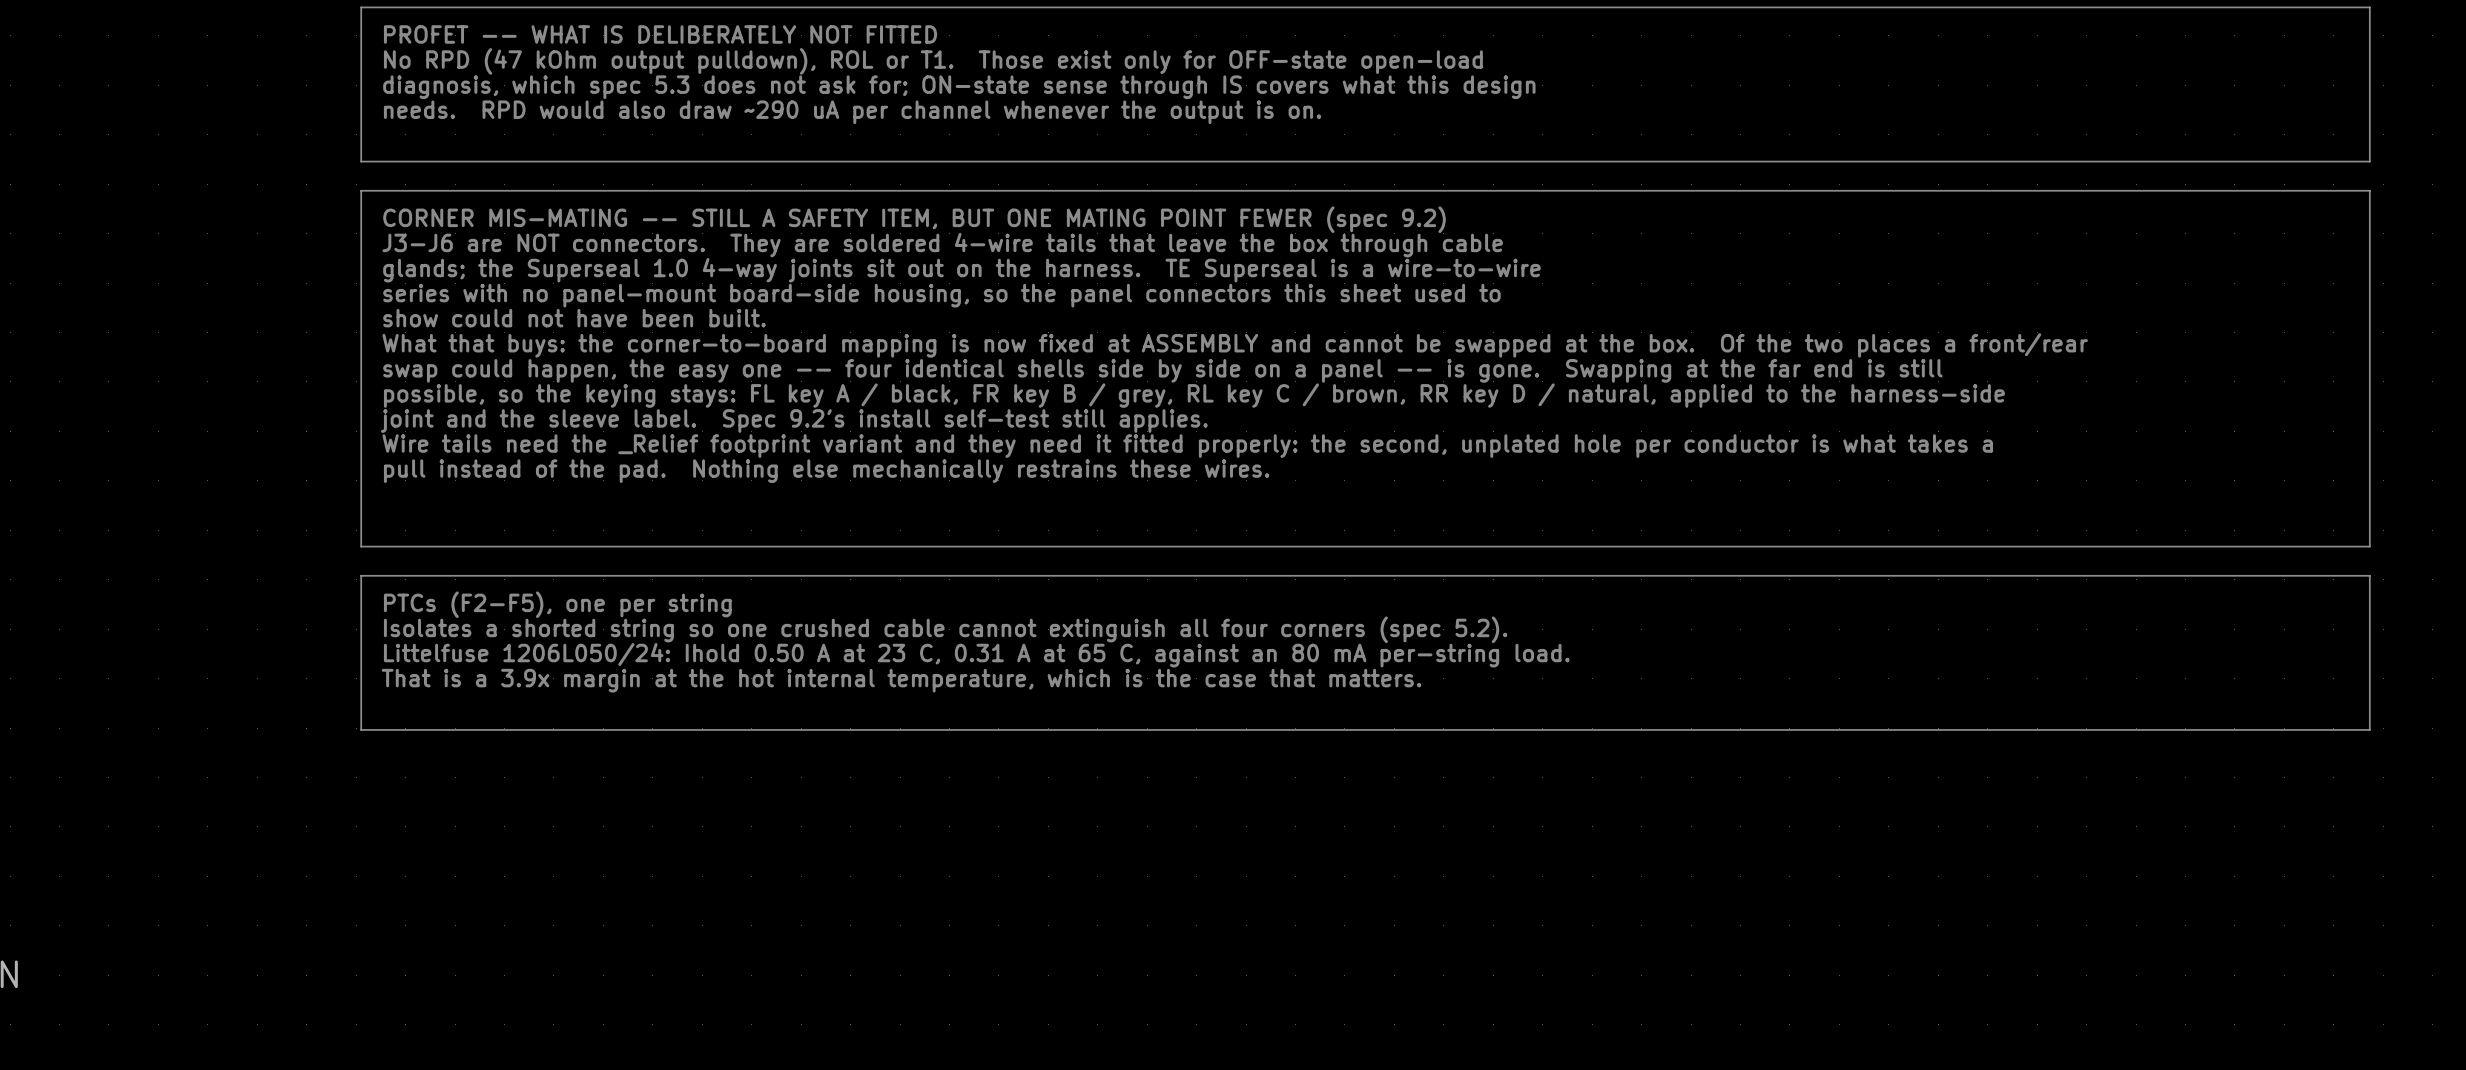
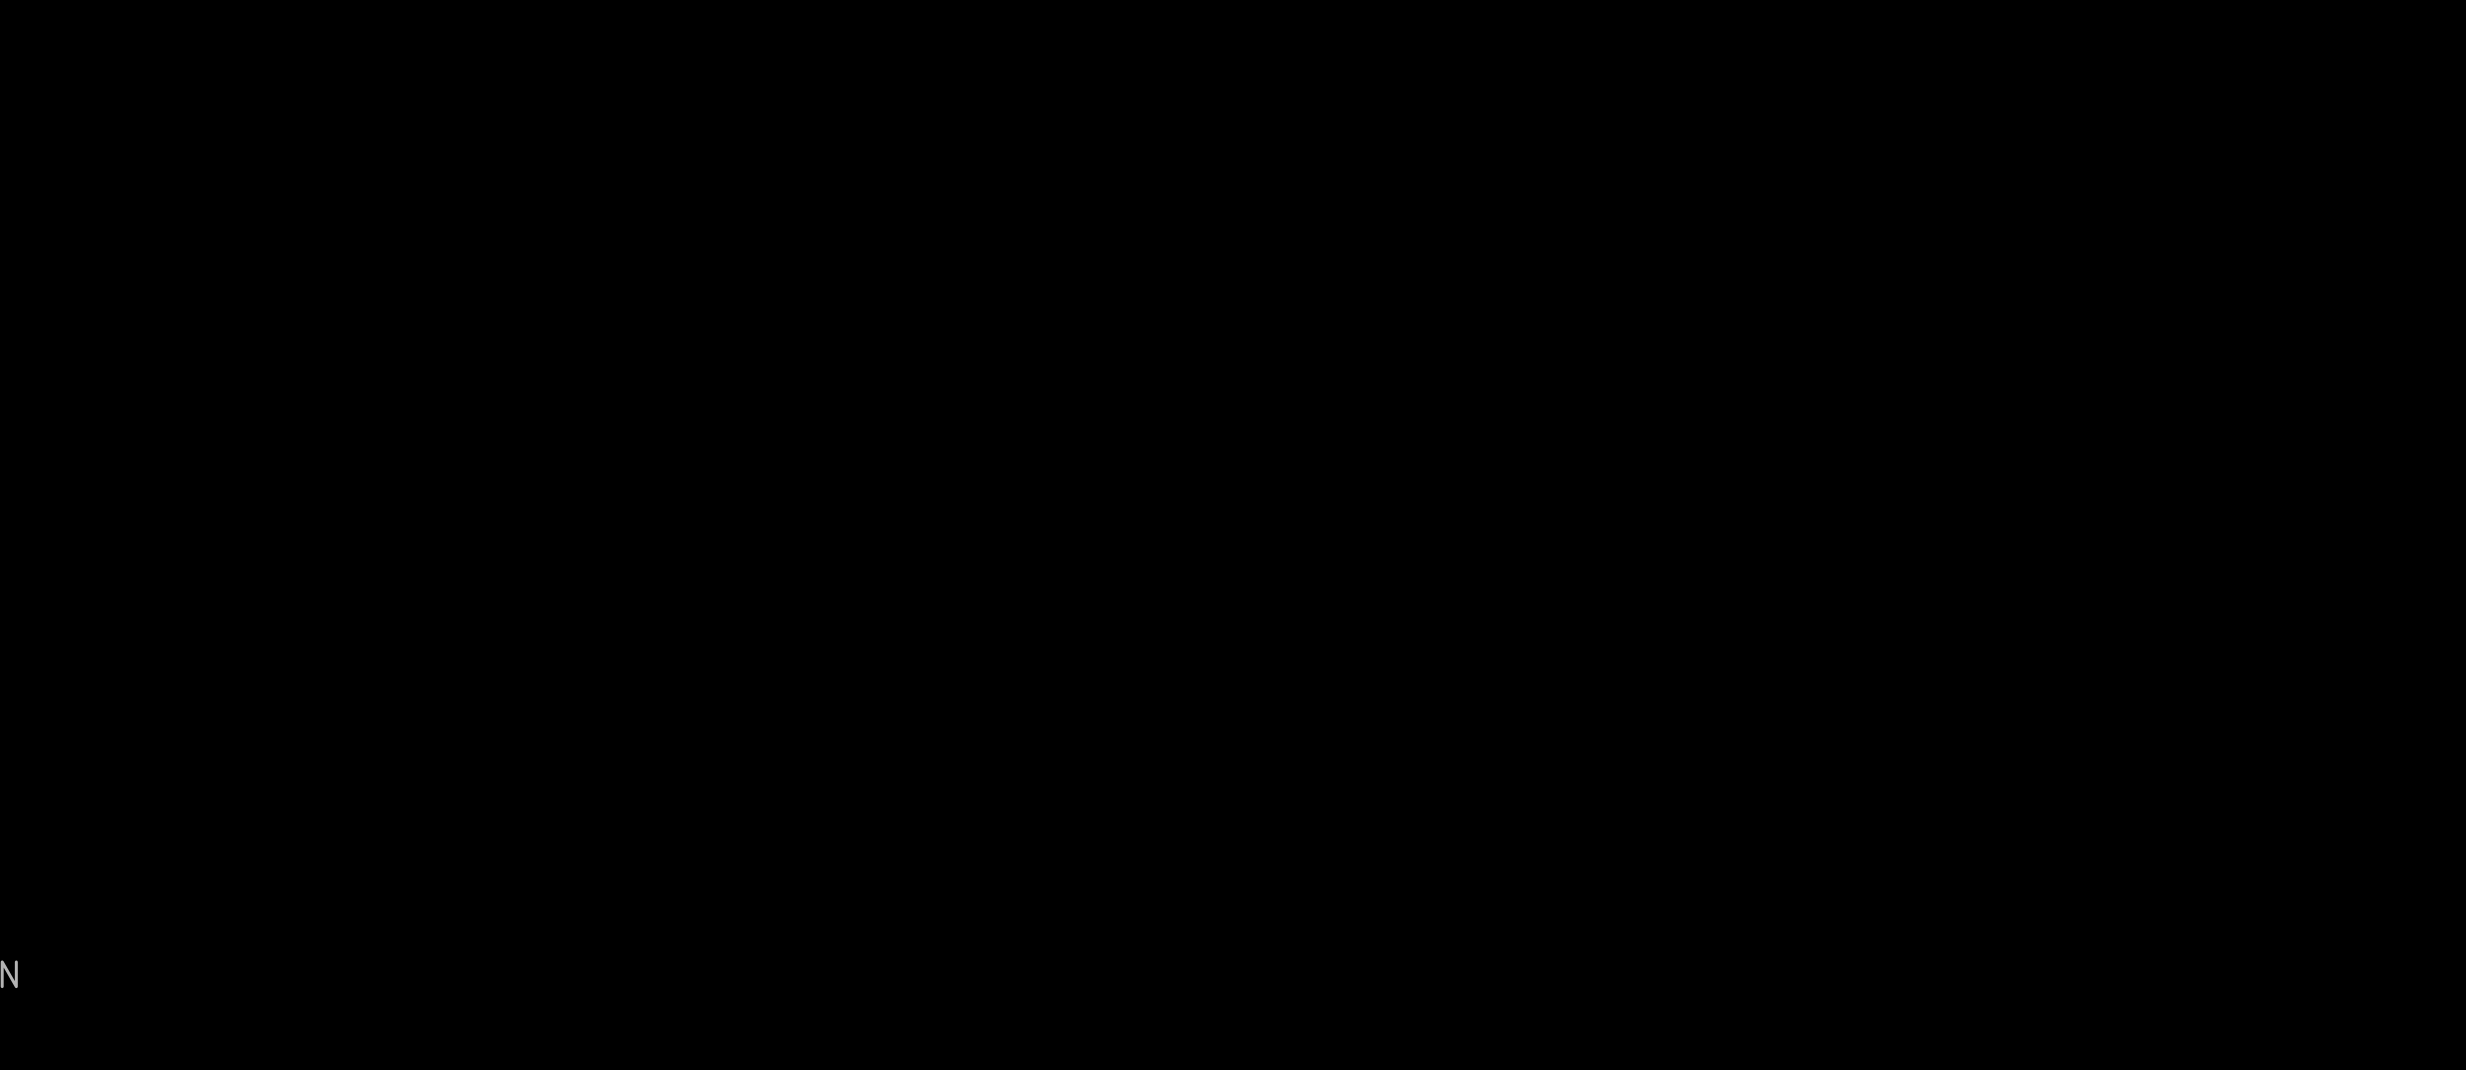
line: (361, 7) (361, 161) (2369, 161) (2369, 7) (361, 7) -> none
text: PROFET -- WHAT IS DELIBERATELY NOT FITTED (660, 34) -> none
text: No RPD (47 kOhm output pulldown), ROL or T1. Those exist only for OFF-state open-load (933, 61) -> none
text: diagnosis, which spec 5.3 does not ask for; ON-state sense through IS covers what this design (959, 87) -> none
text: needs. RPD would also draw ~290 uA per channel whenever the output is on. (852, 112) -> none
line: (361, 190) (361, 546) (2369, 546) (2369, 190) (361, 190) -> none
text: CORNER MIS-MATING -- STILL A SAFETY ITEM, BUT ONE MATING POINT FEWER (spec 9.2) (914, 219) -> none
text: J3-J6 are NOT connectors. They are soldered 4-wire tails that leave the box through cable (942, 245) -> none
text: glands; the Superseal 1.0 4-way joints sit out on the harness. TE Superseal is a wire-to-wire (961, 270) -> none
text: series with no panel-mount board-side housing, so the panel connectors this sheet used to (941, 295) -> none
text: show could not have been built. (574, 318) -> none
text: What that buys: the corner-to-board mapping is now fixed at ASSEMBLY and cannot be swapped at the box. Of the two places a front/rear (1235, 345) -> none
text: swap could happen, the easy one -- four identical shells side by side on a panel -- is gone. Swapping at the far end is still (1162, 370) -> none
text: possible, so the keying stays: FL key A / black, FR key B / grey, RL key C / brown, RR key D / natural, applied to the harness-side (1194, 395) -> none
text: joint and the sleeve label. Spec 9.2's install self-test still applies. (794, 421) -> none
text: Wire tails need the _Relief footprint variant and they need it fitted properly: the second, unplated hole per conductor is what takes a (1187, 446) -> none
text: pull instead of the pad. Nothing else mechanically restrains these wires. (826, 471) -> none
line: (361, 575) (2369, 575) (2369, 729) (361, 729) (361, 575) -> none
text: PTCs (F2-F5), one per string (557, 604) -> none
text: Isolates a shorted string so one crushed cable cannot extinguish all four corners (spec 5.2). (945, 629) -> none
text: Littelfuse 1206L050/24: Ihold 0.50 A at 23 C, 0.31 A at 65 C, against an 80 mA per-string load. (976, 655) -> none
text: That is a 3.9x margin at the hot internal temperature, which is the case that matters. (901, 680) -> none

